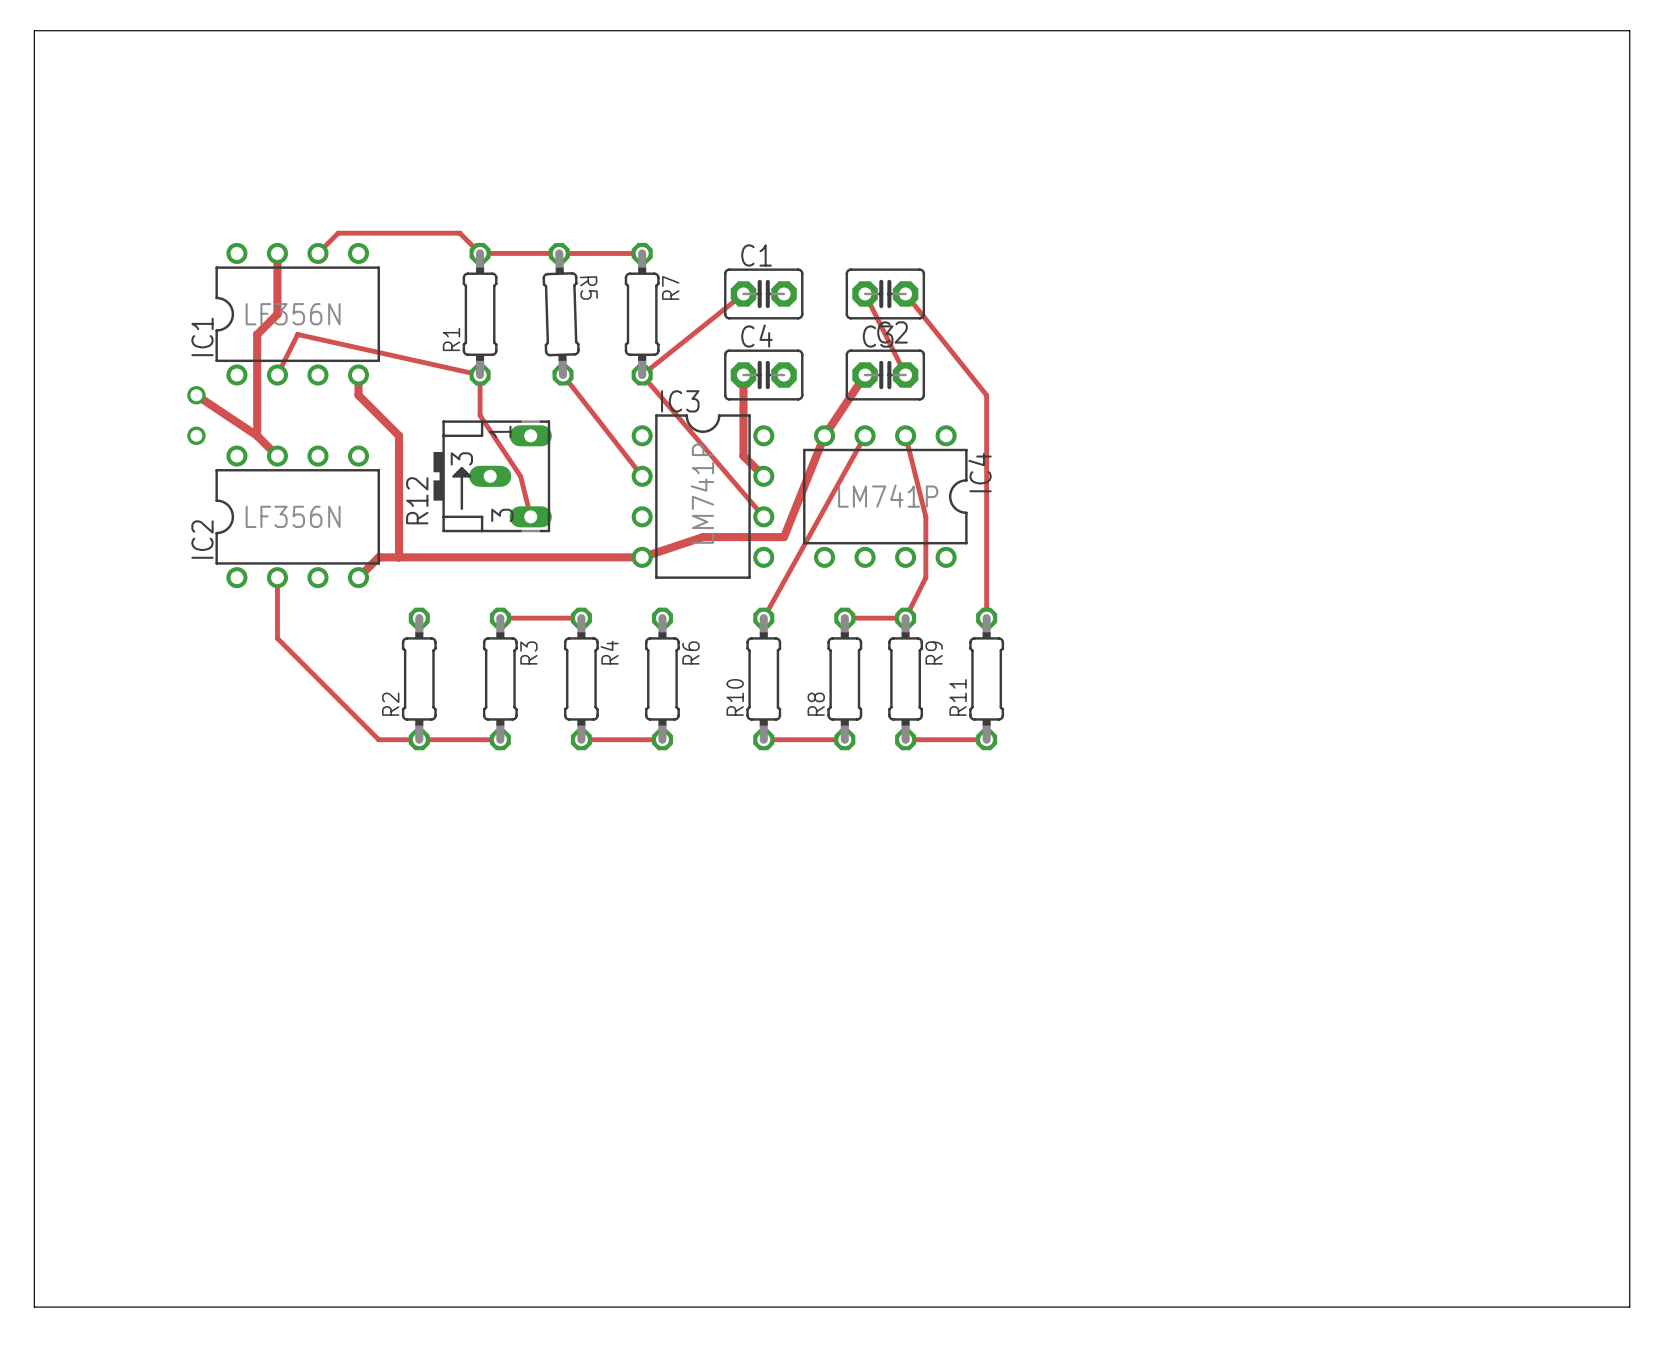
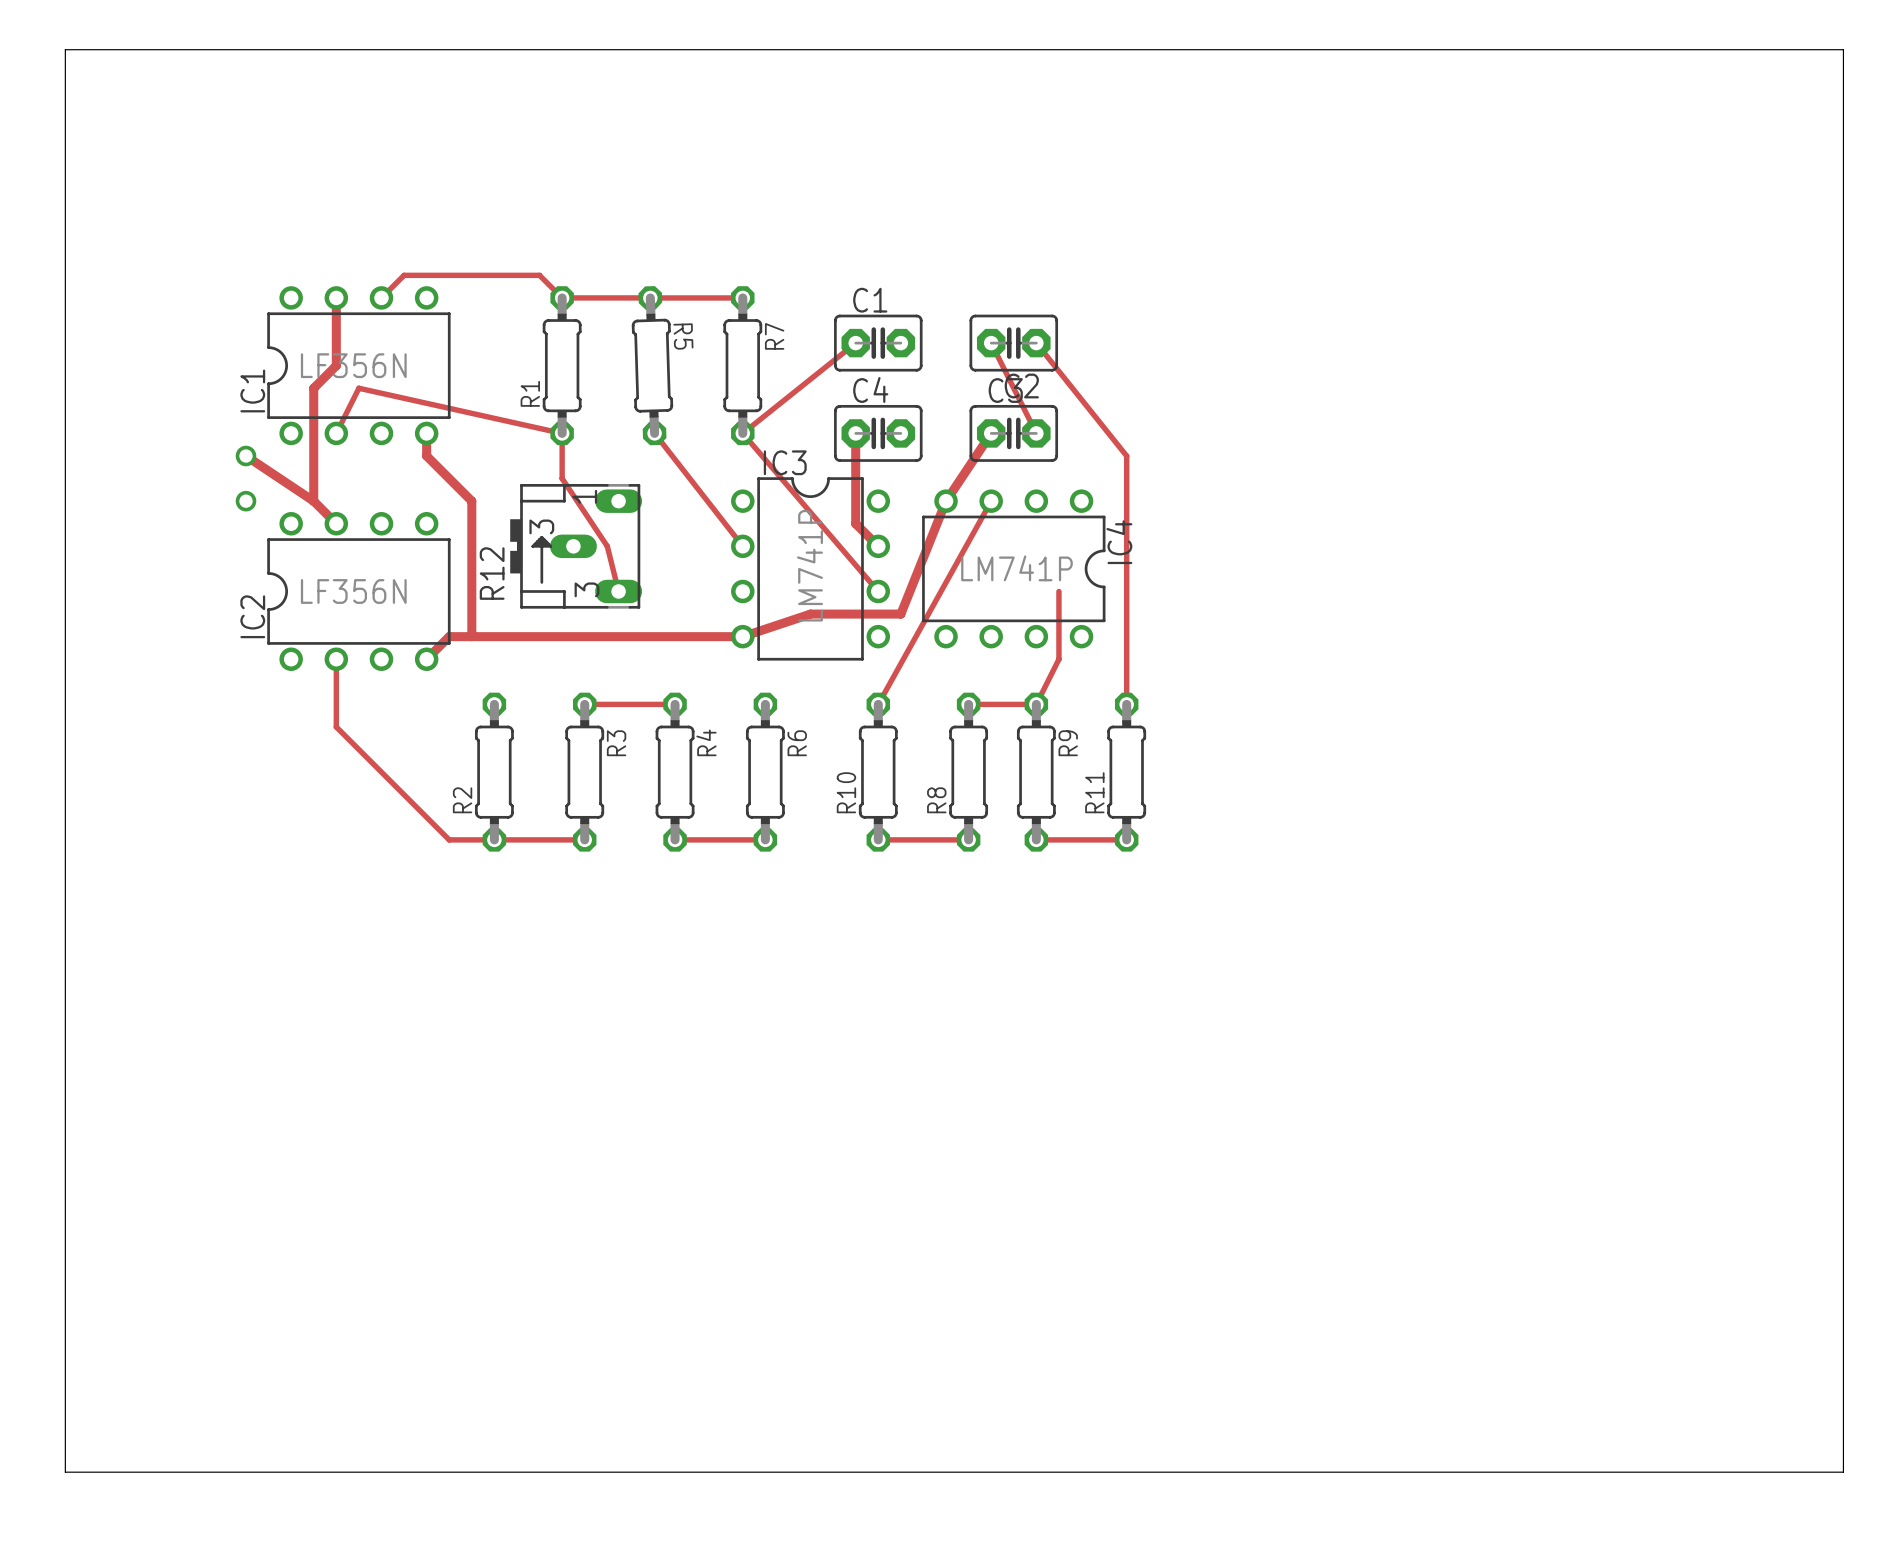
track: (905, 435) (925, 516) -> none

